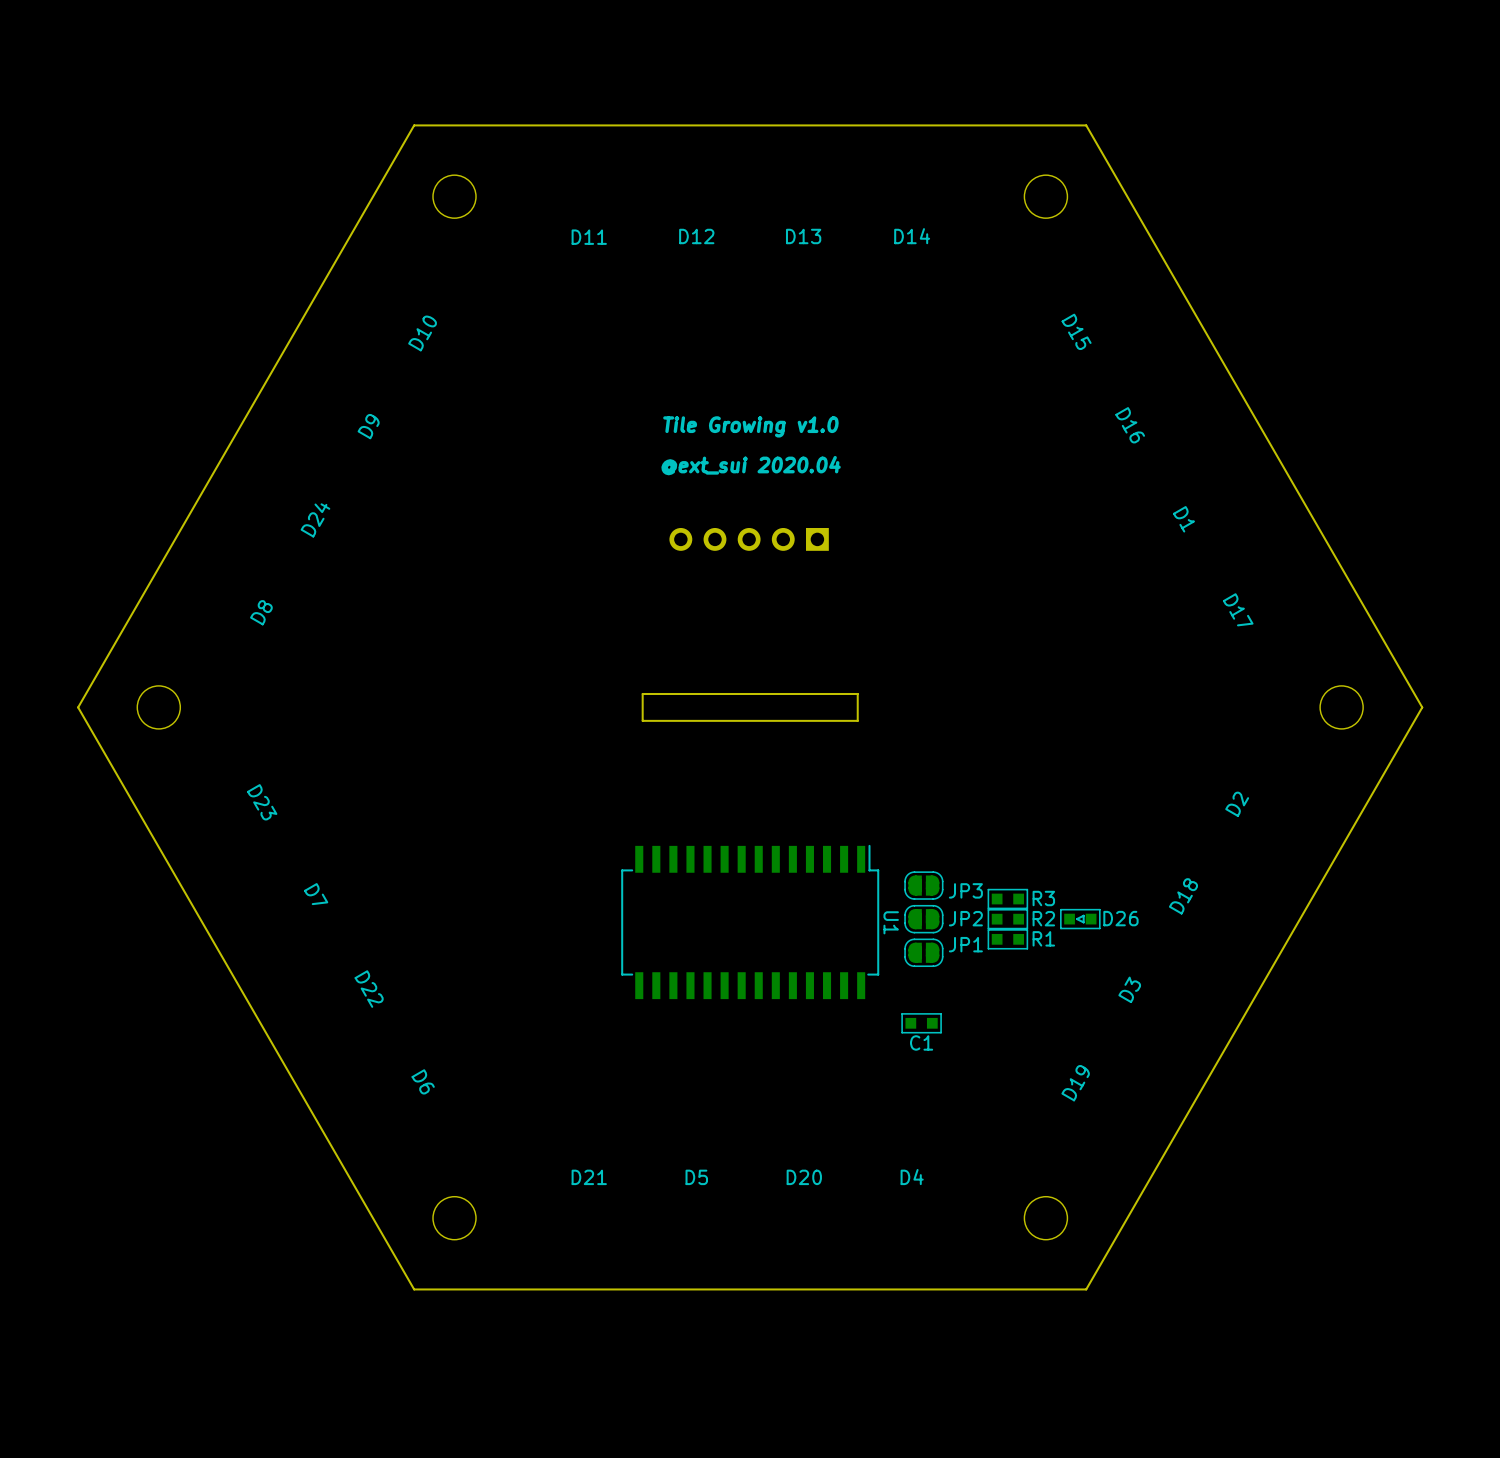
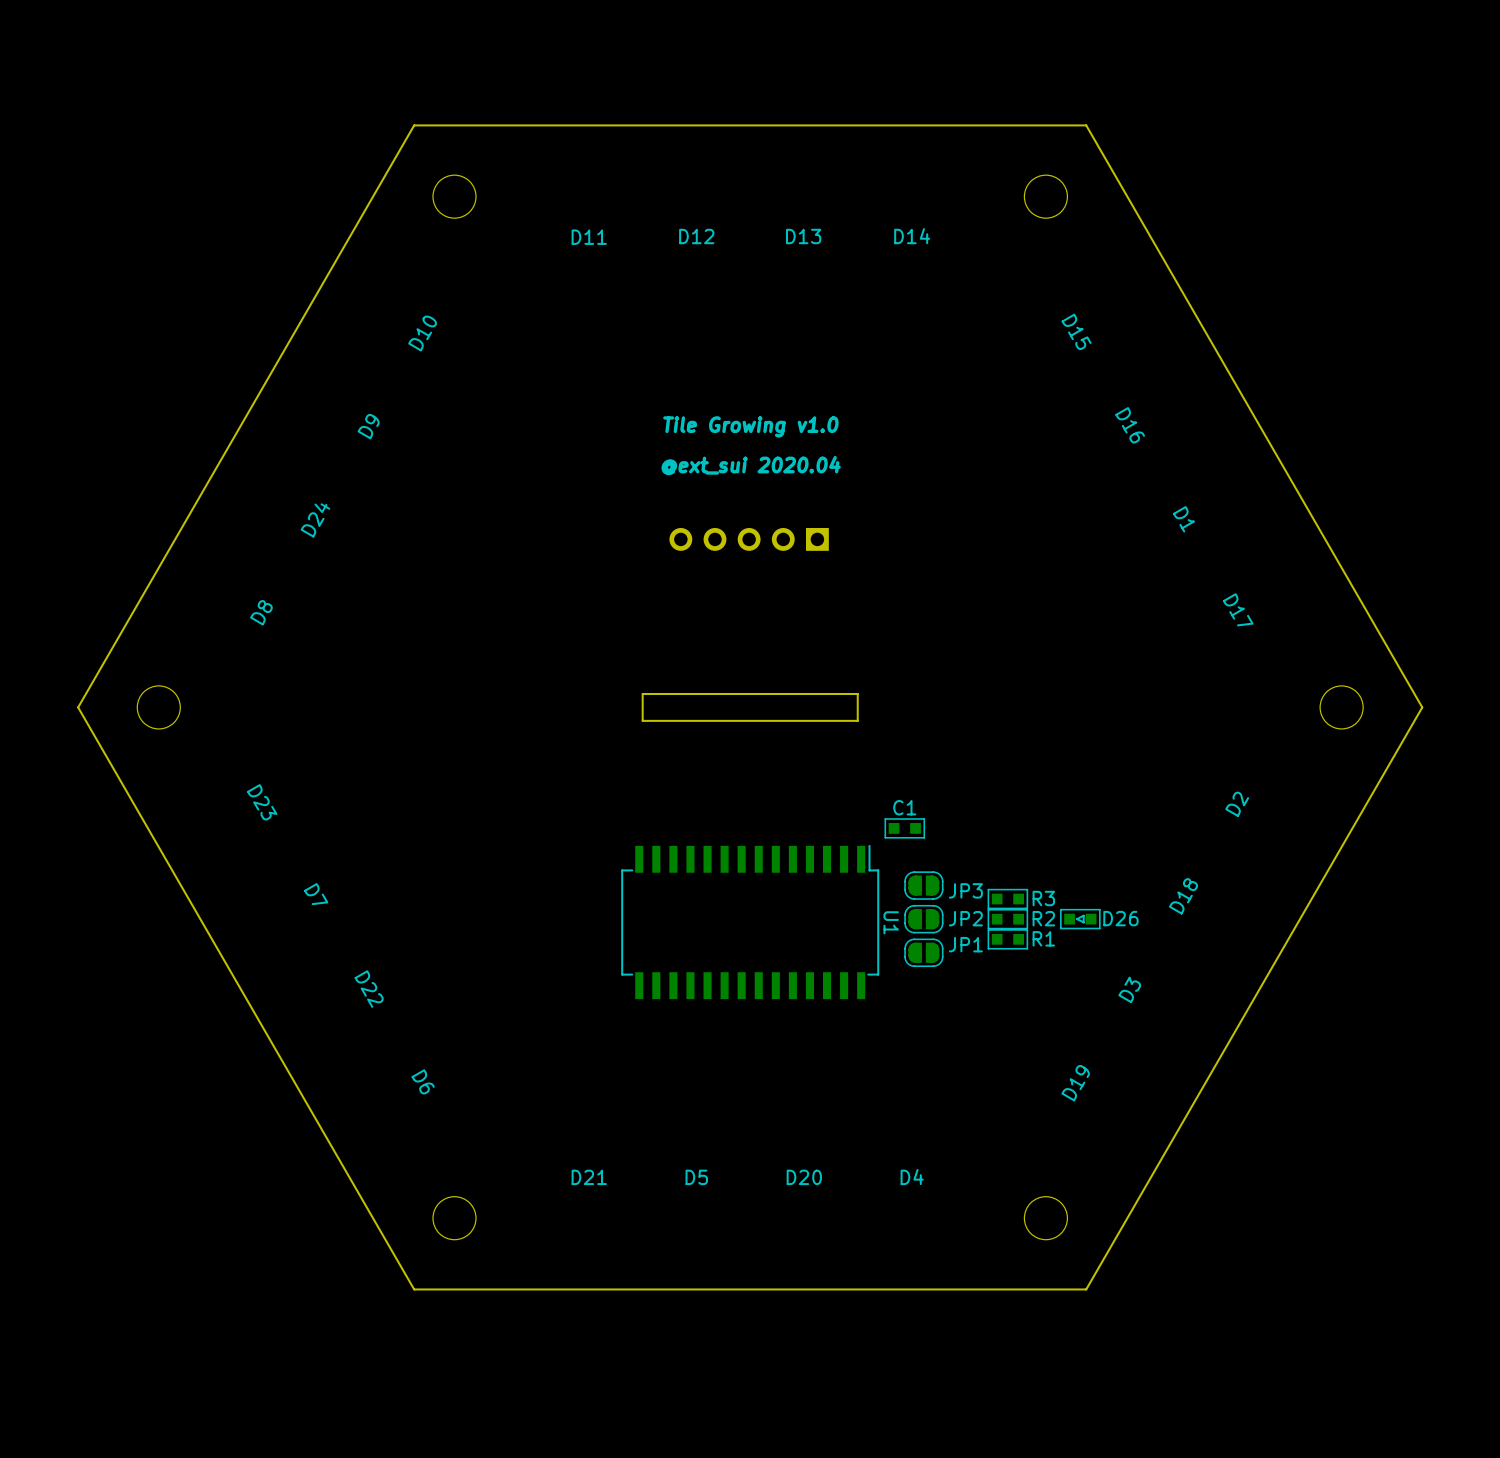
C1 position: (921, 1023) -> (904, 828)
C1 name position: C1 (921, 1042) -> C1 (904, 807)

